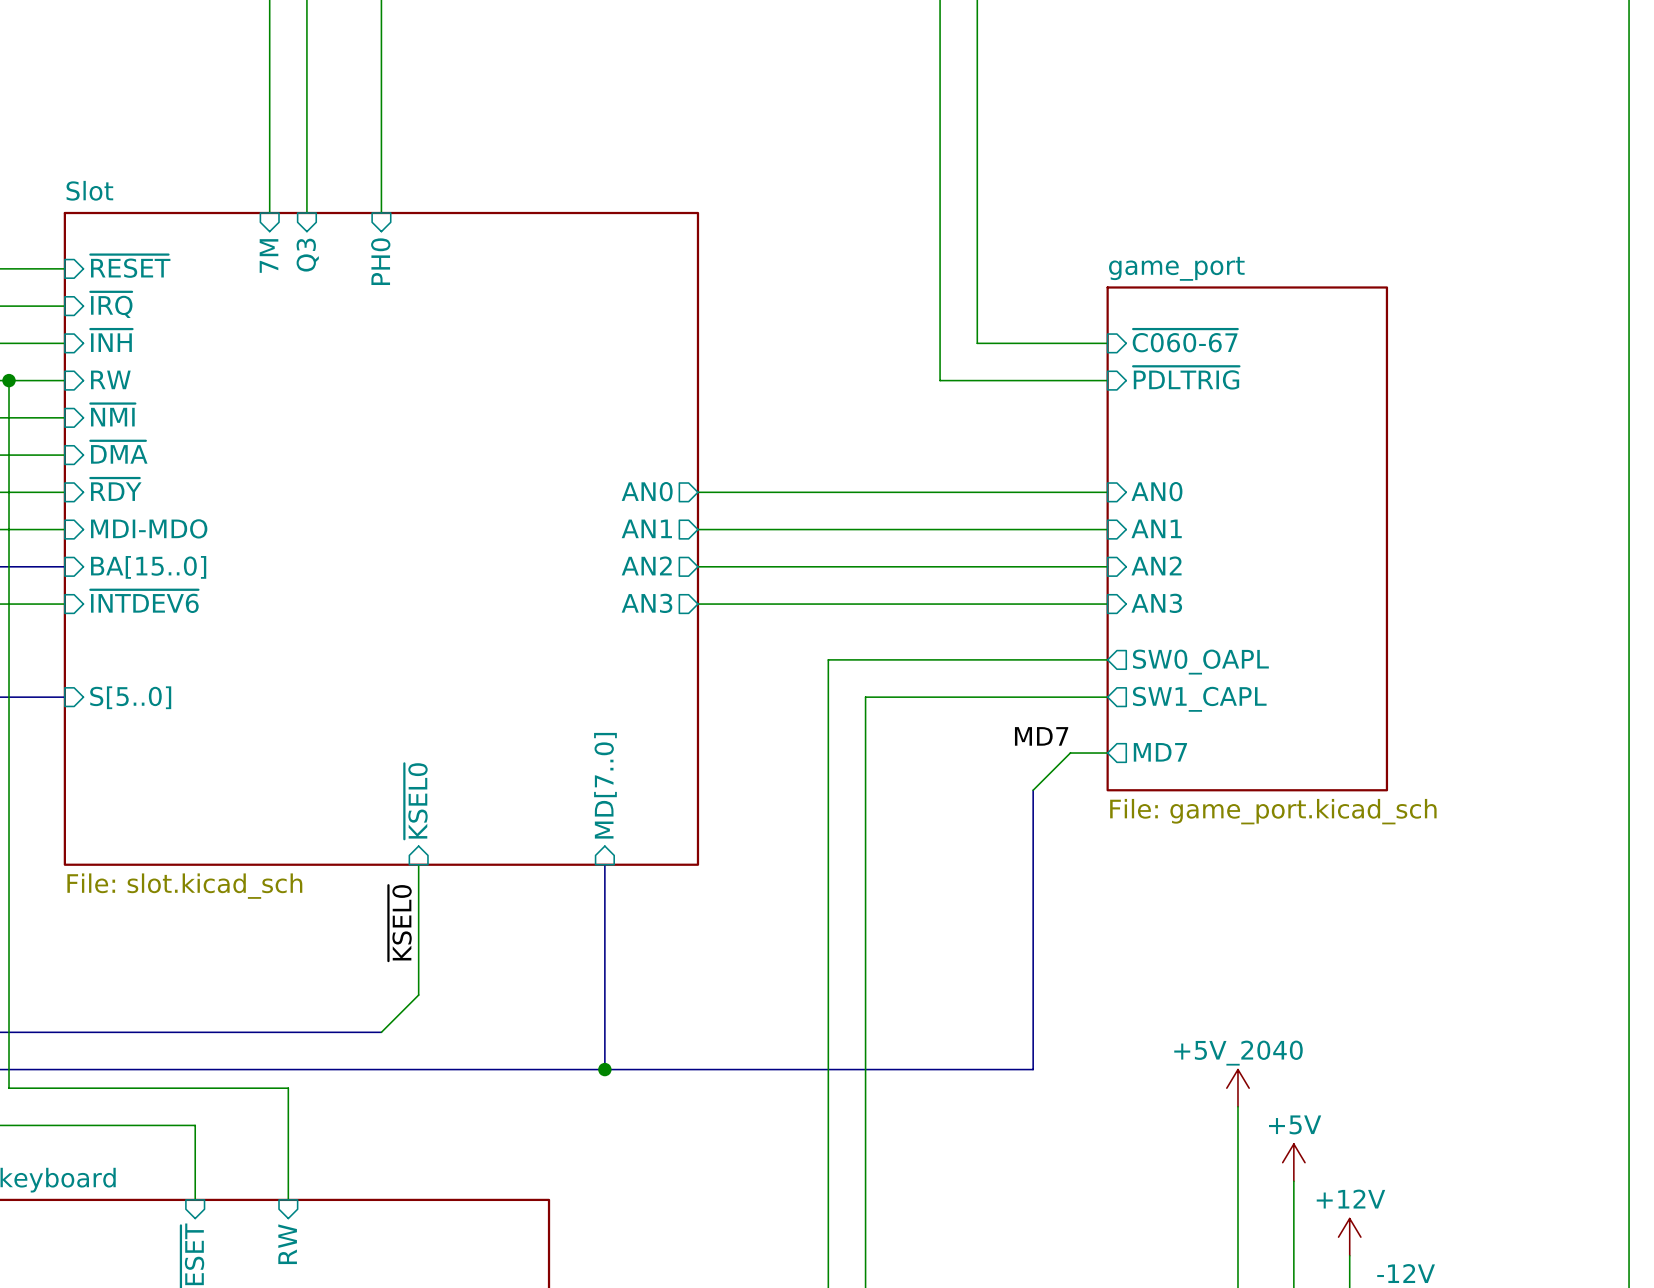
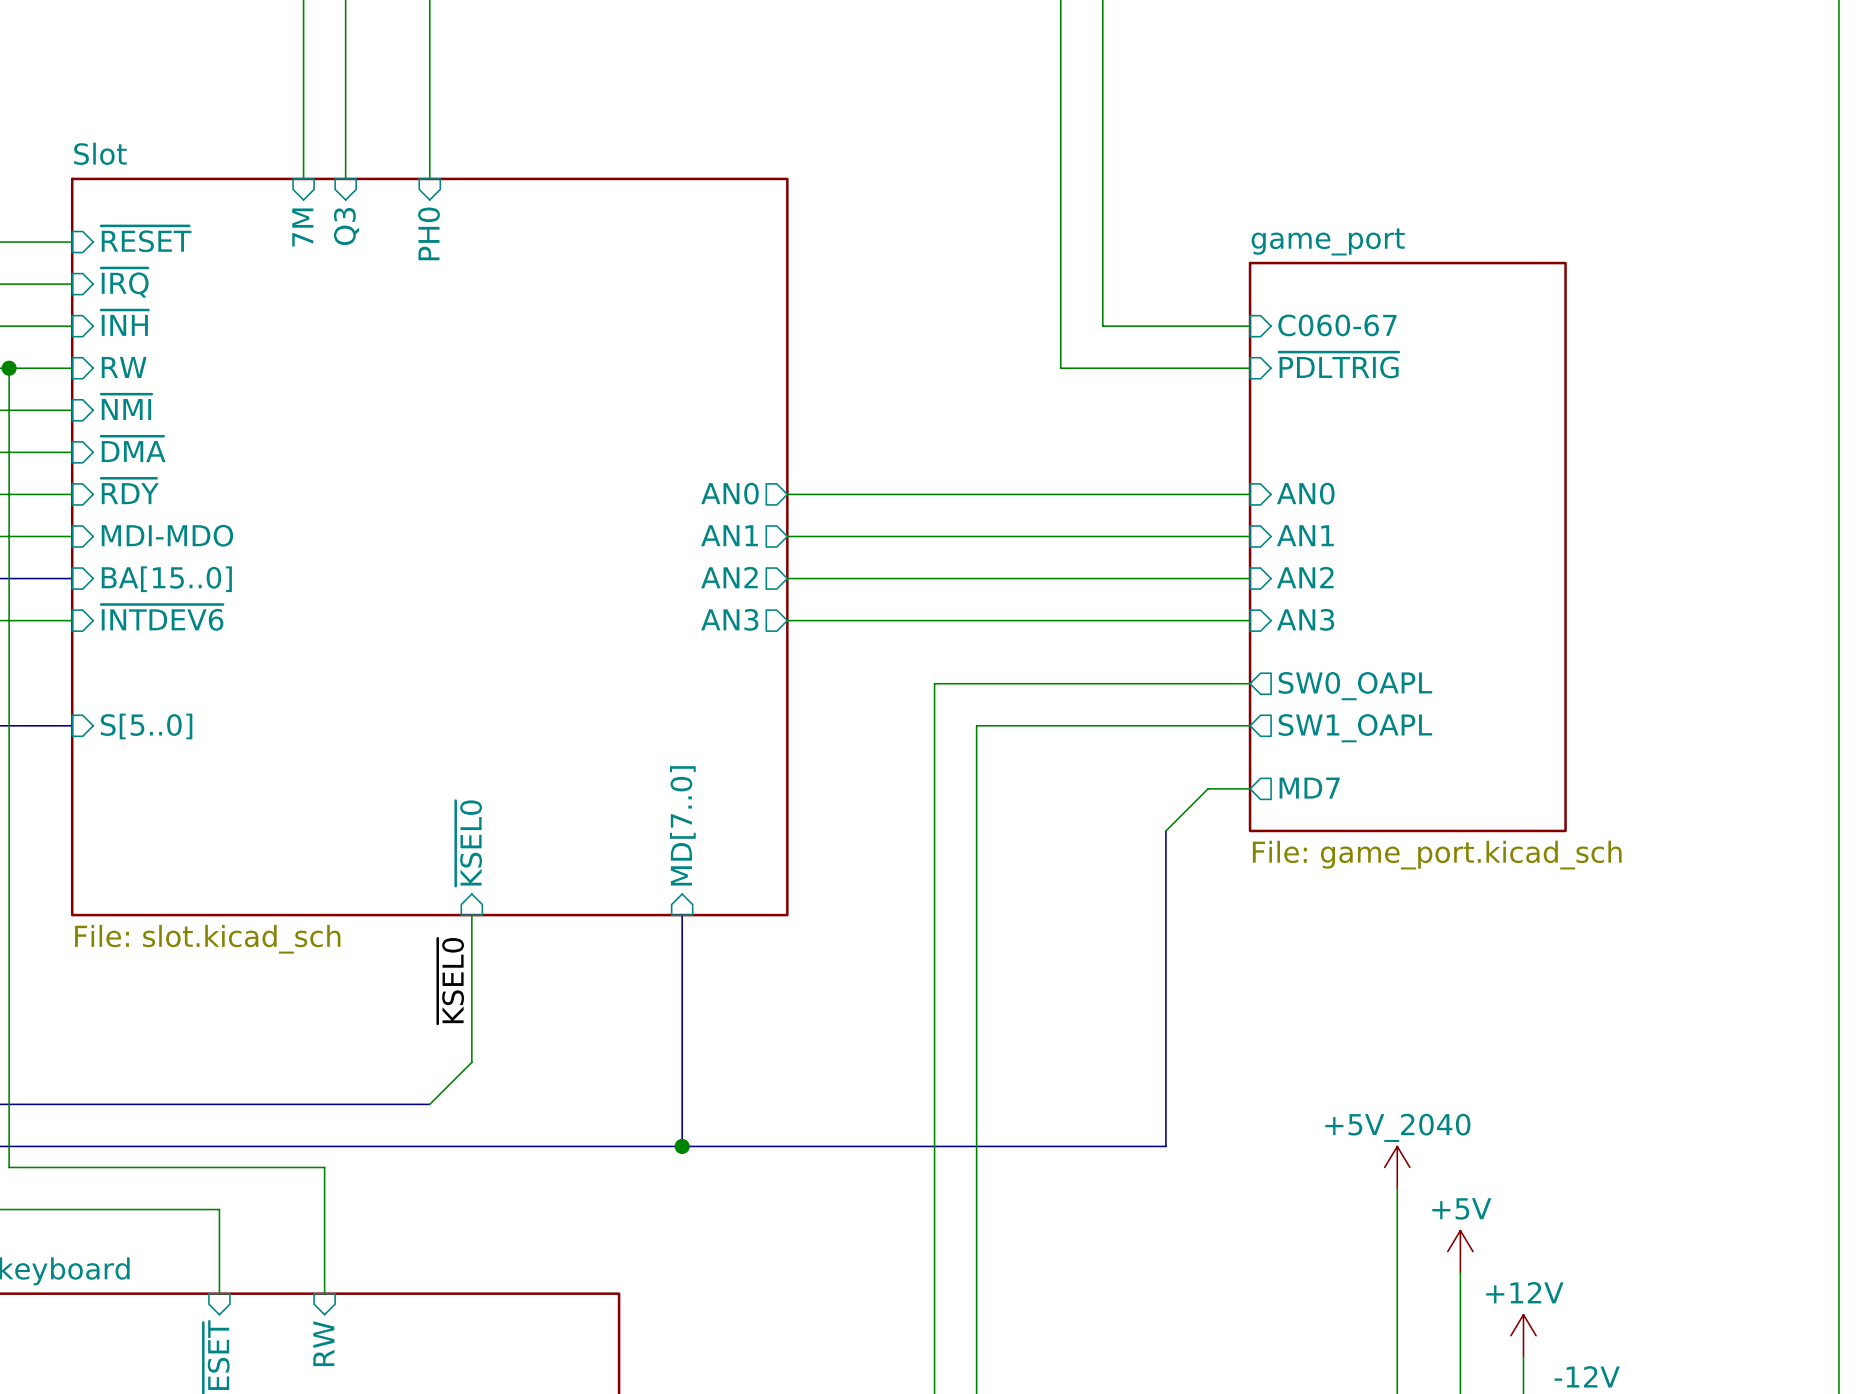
sheet pin: ~{C060-67} (1185, 340) -> C060-67 (1337, 325)
sheet pin: SW1_CAPL (1199, 699) -> SW1_OAPL (1355, 728)
label: MD7 (1041, 736) -> none

